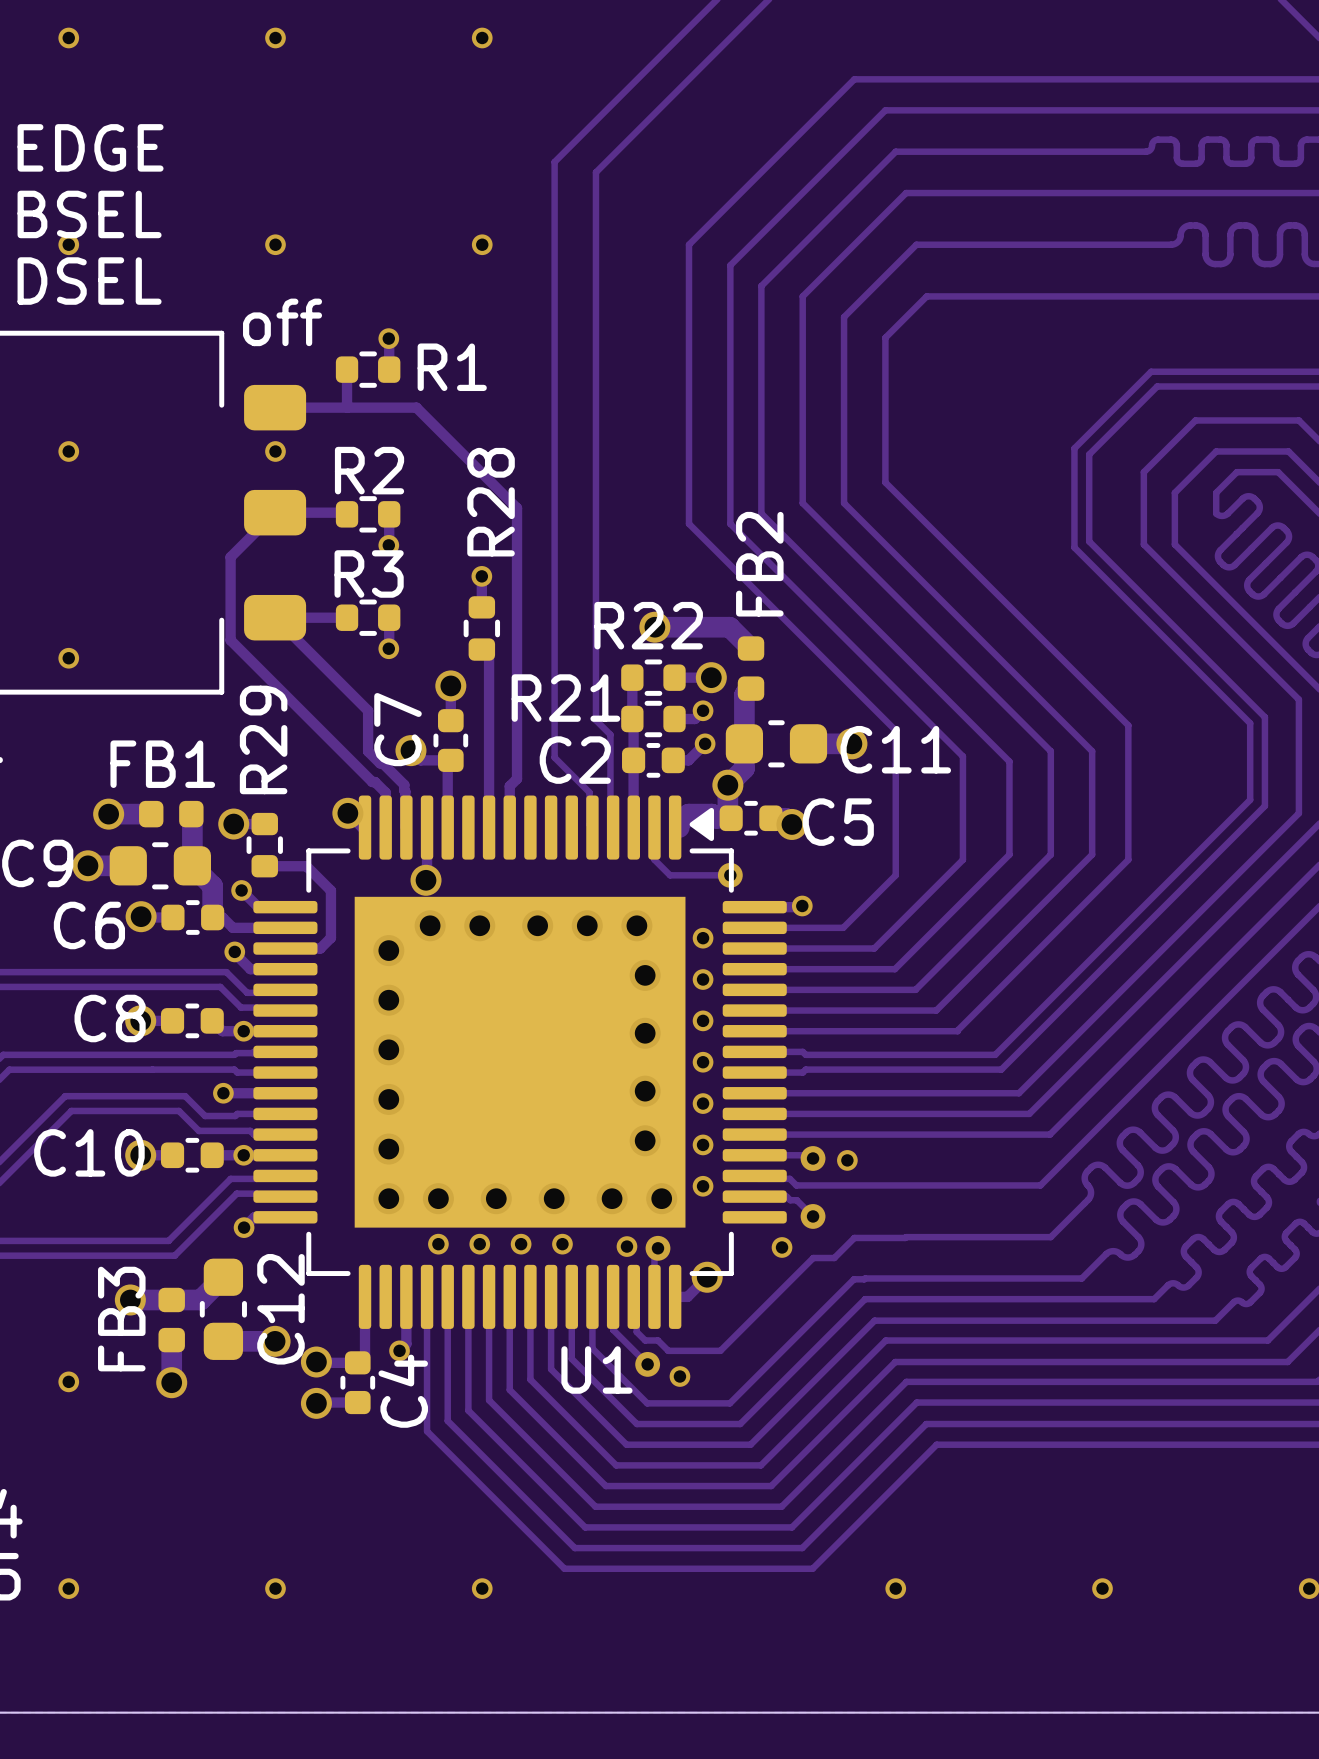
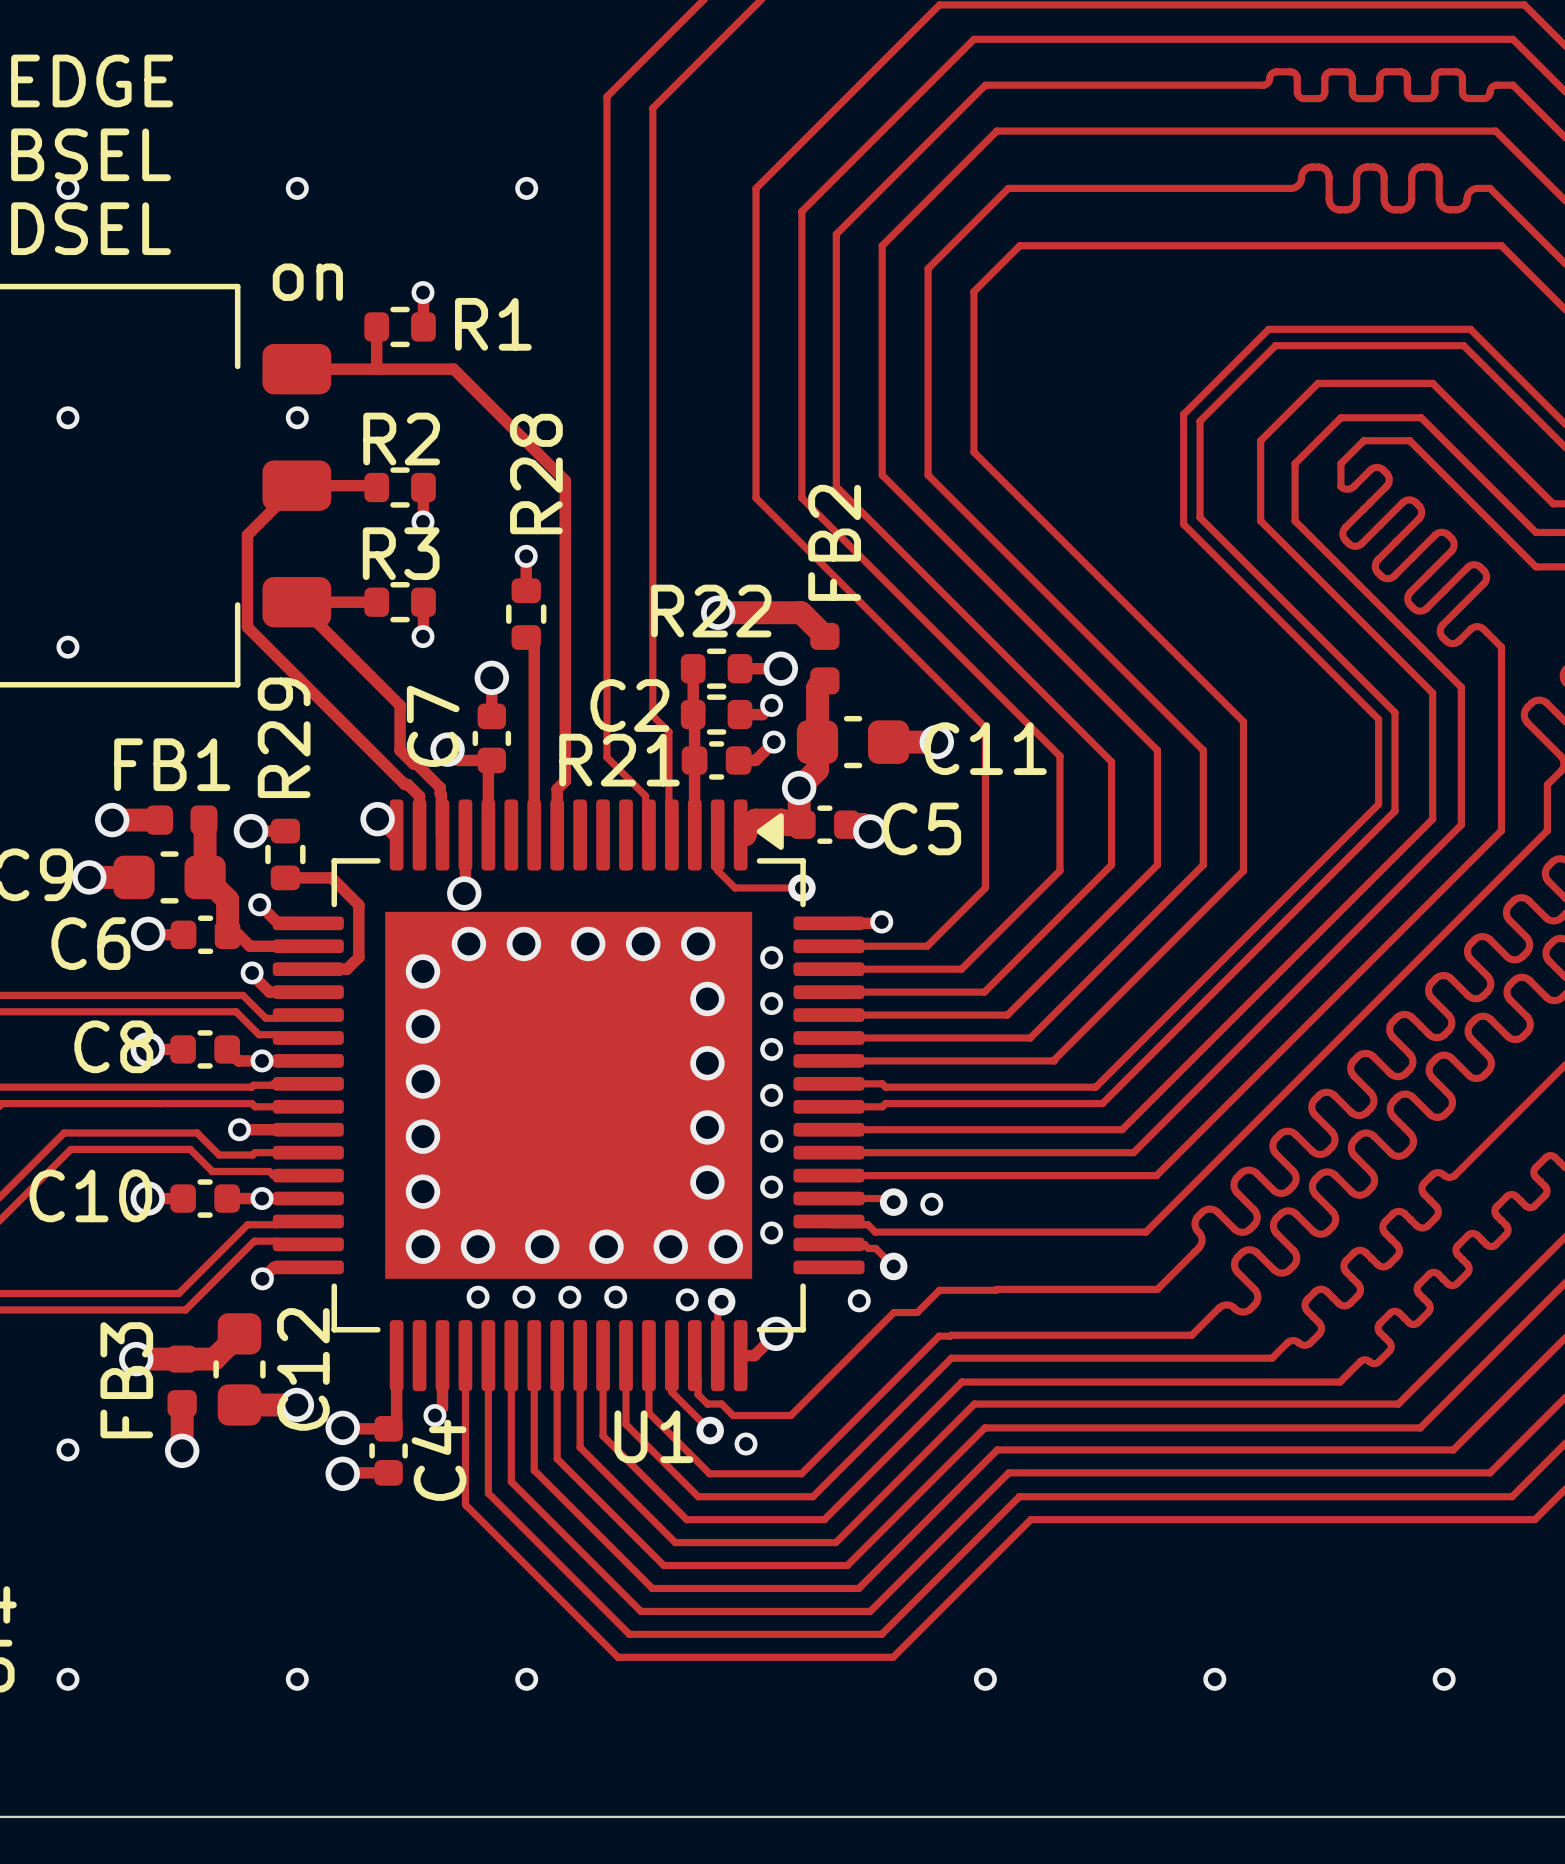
text: off (282, 322) -> on (307, 282)
R21 name position: R21 (565, 698) -> R21 (619, 760)
C2 name position: C2 (575, 760) -> C2 (629, 705)

